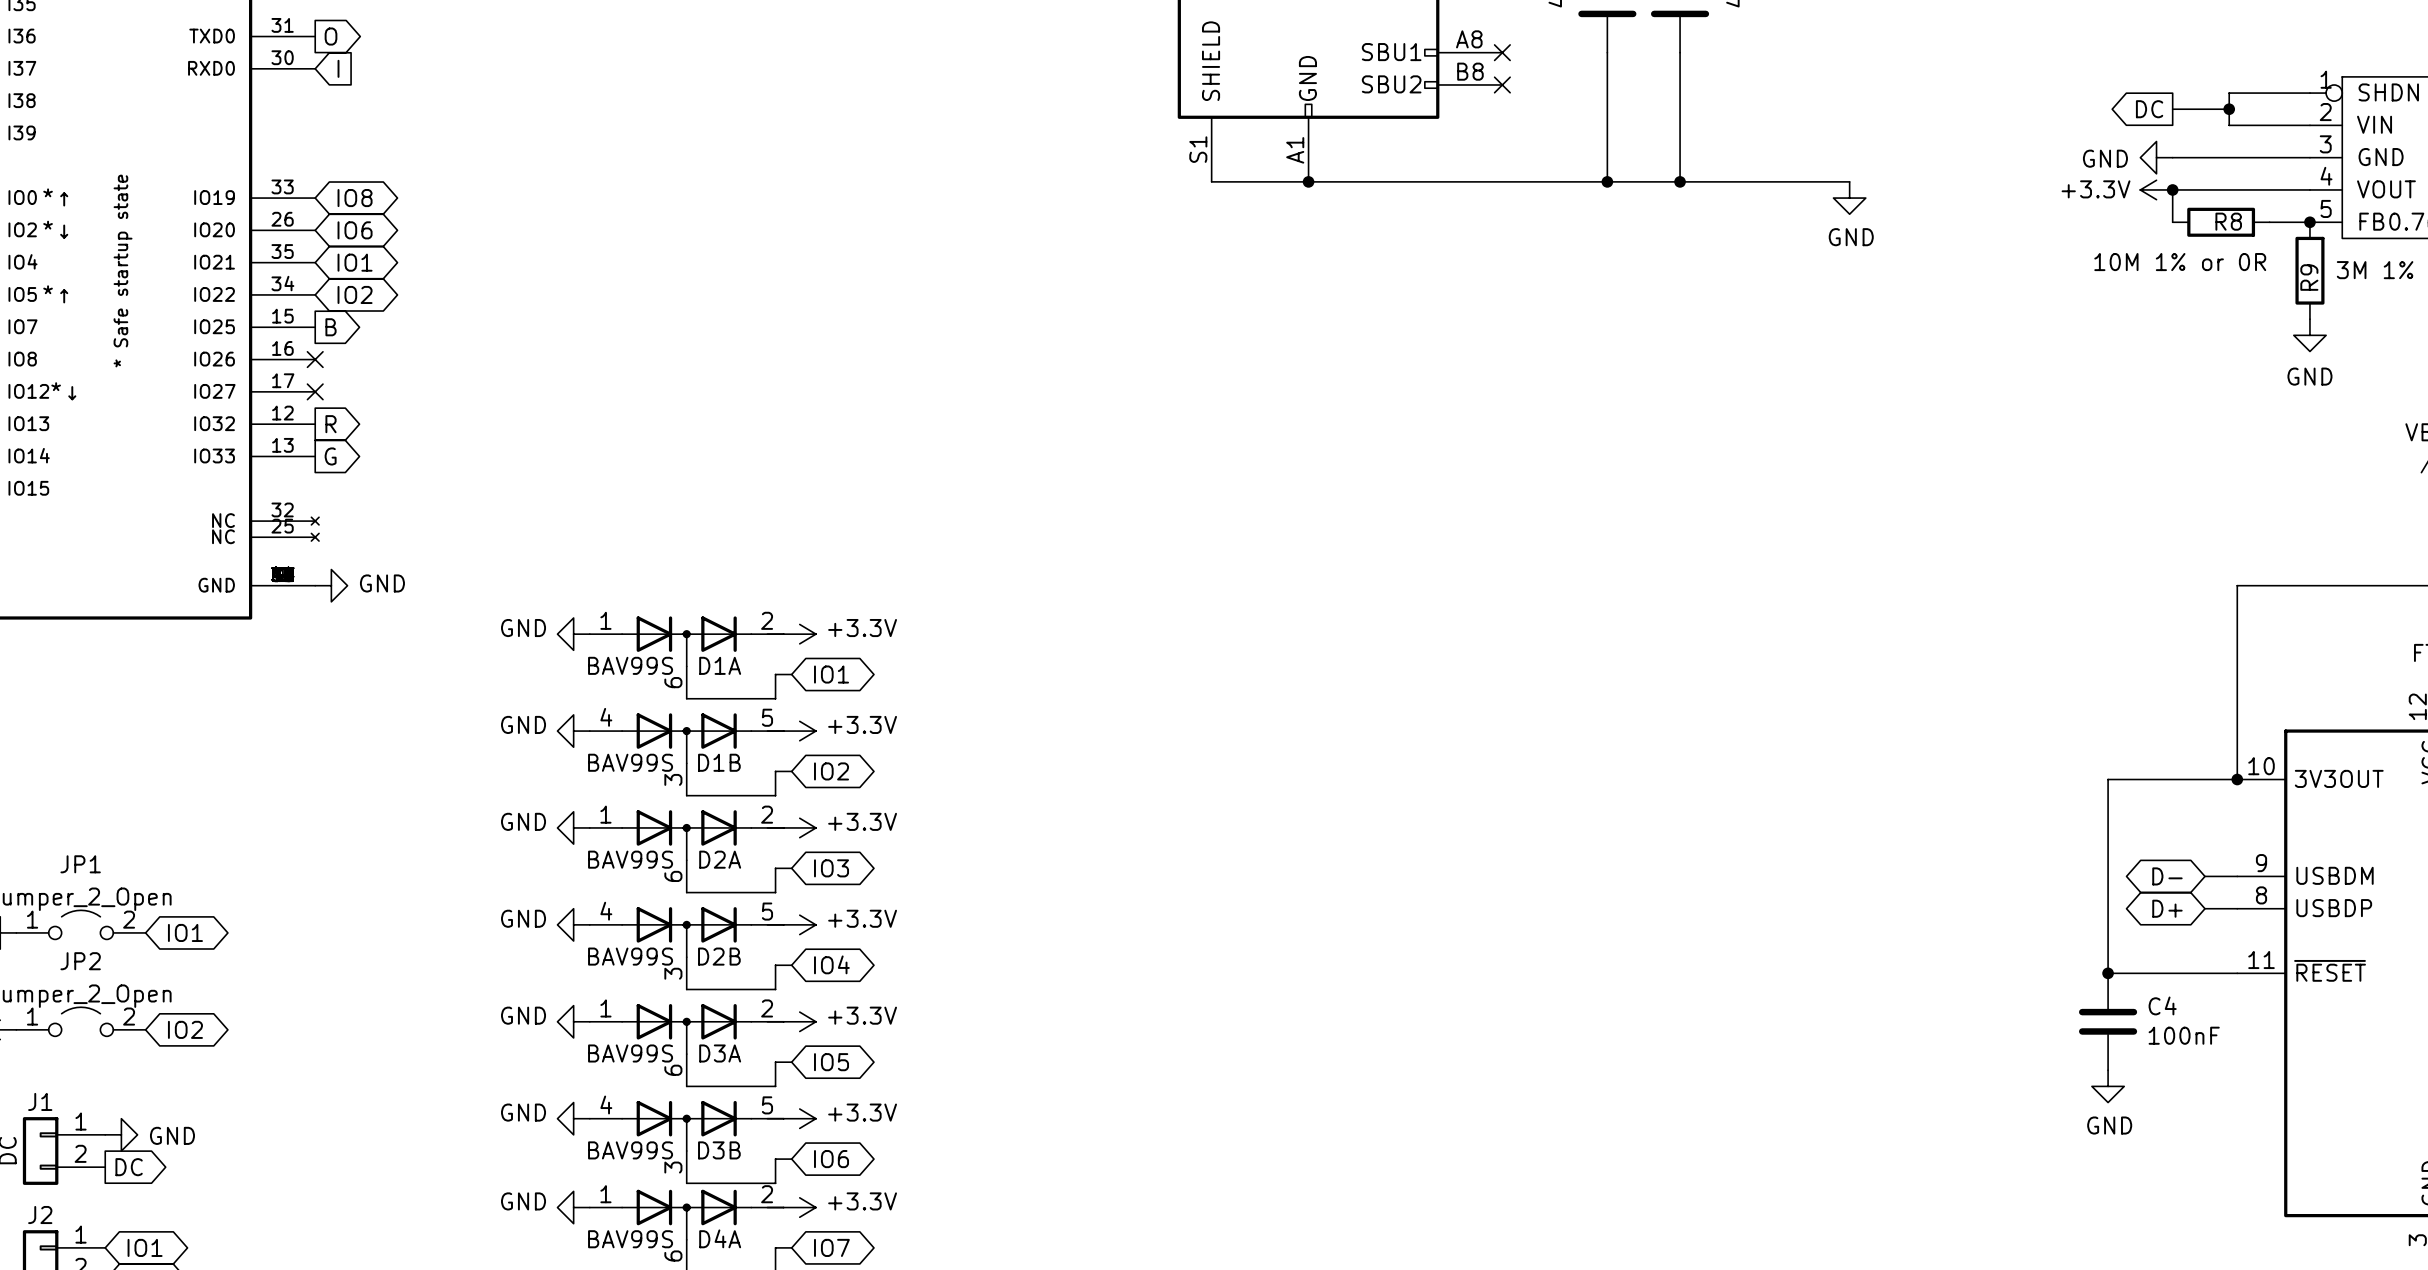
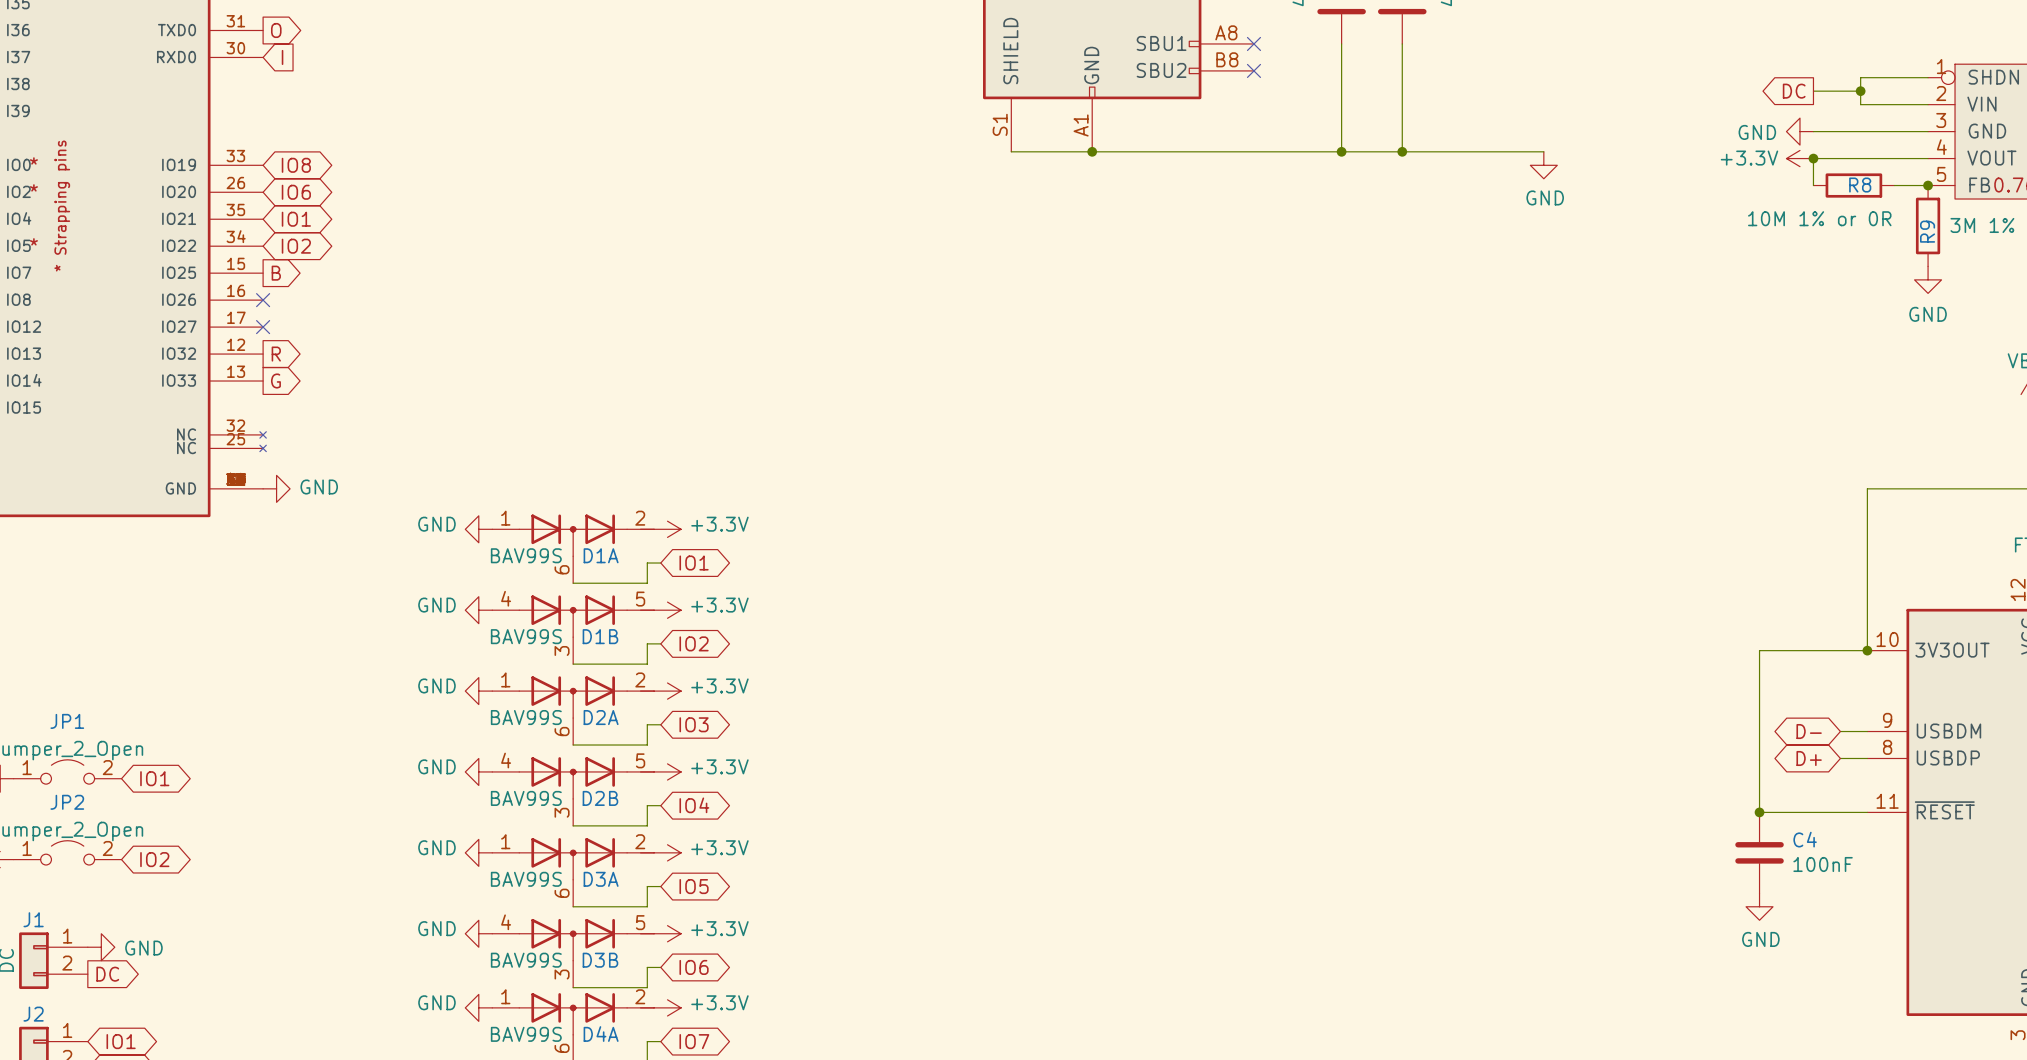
part text: *↑ (55, 197) -> * (33, 160)
part text: *↓ (55, 229) -> * (33, 187)
part text: none -> * Strapping pins (62, 206)
part text: * Safe startup state (123, 271) -> none
part text: *↑ (55, 294) -> * (33, 241)
part text: *↓ (63, 391) -> none

